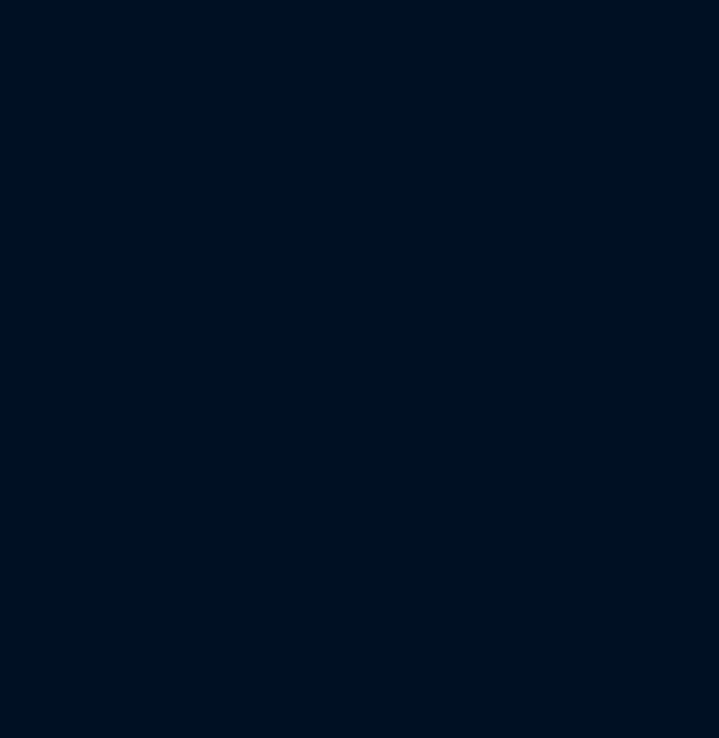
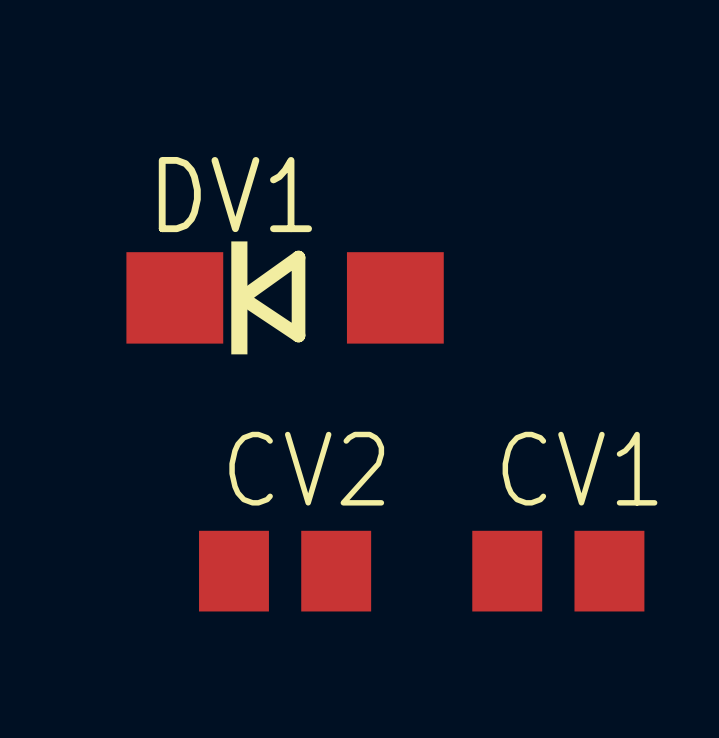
DV1: none -> (285, 297)
CV2: none -> (285, 571)
CV1: none -> (558, 571)

